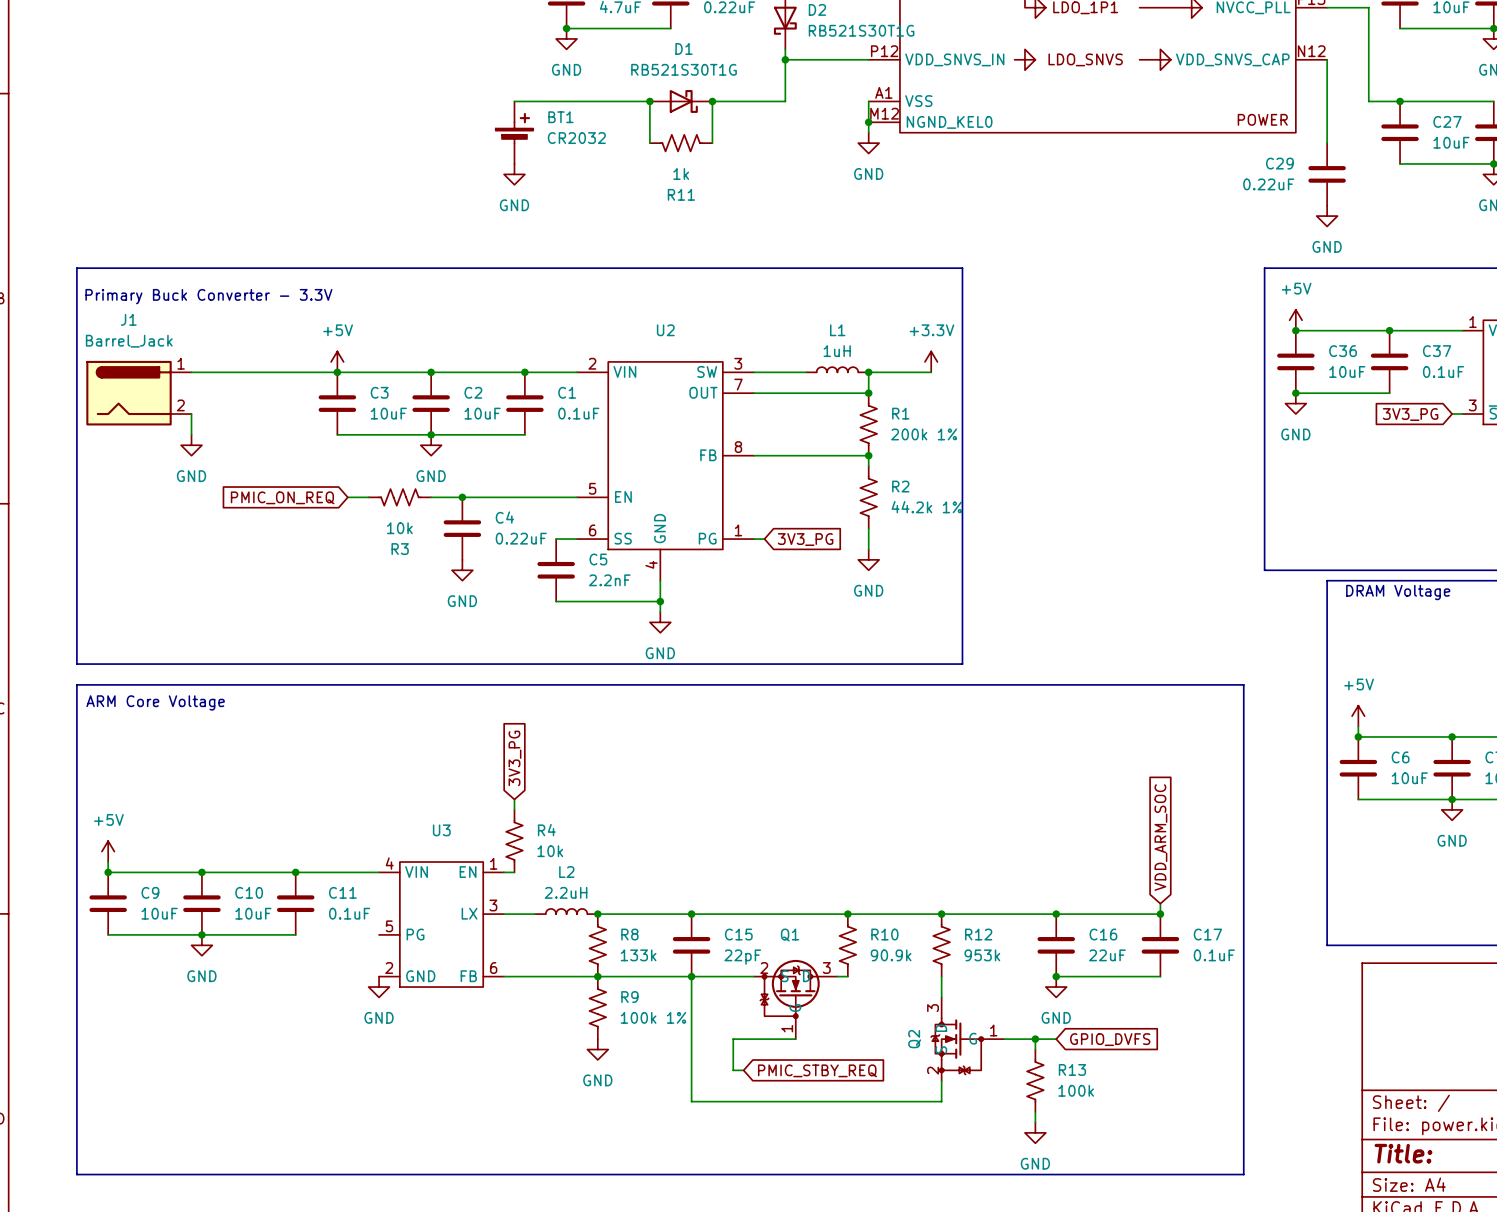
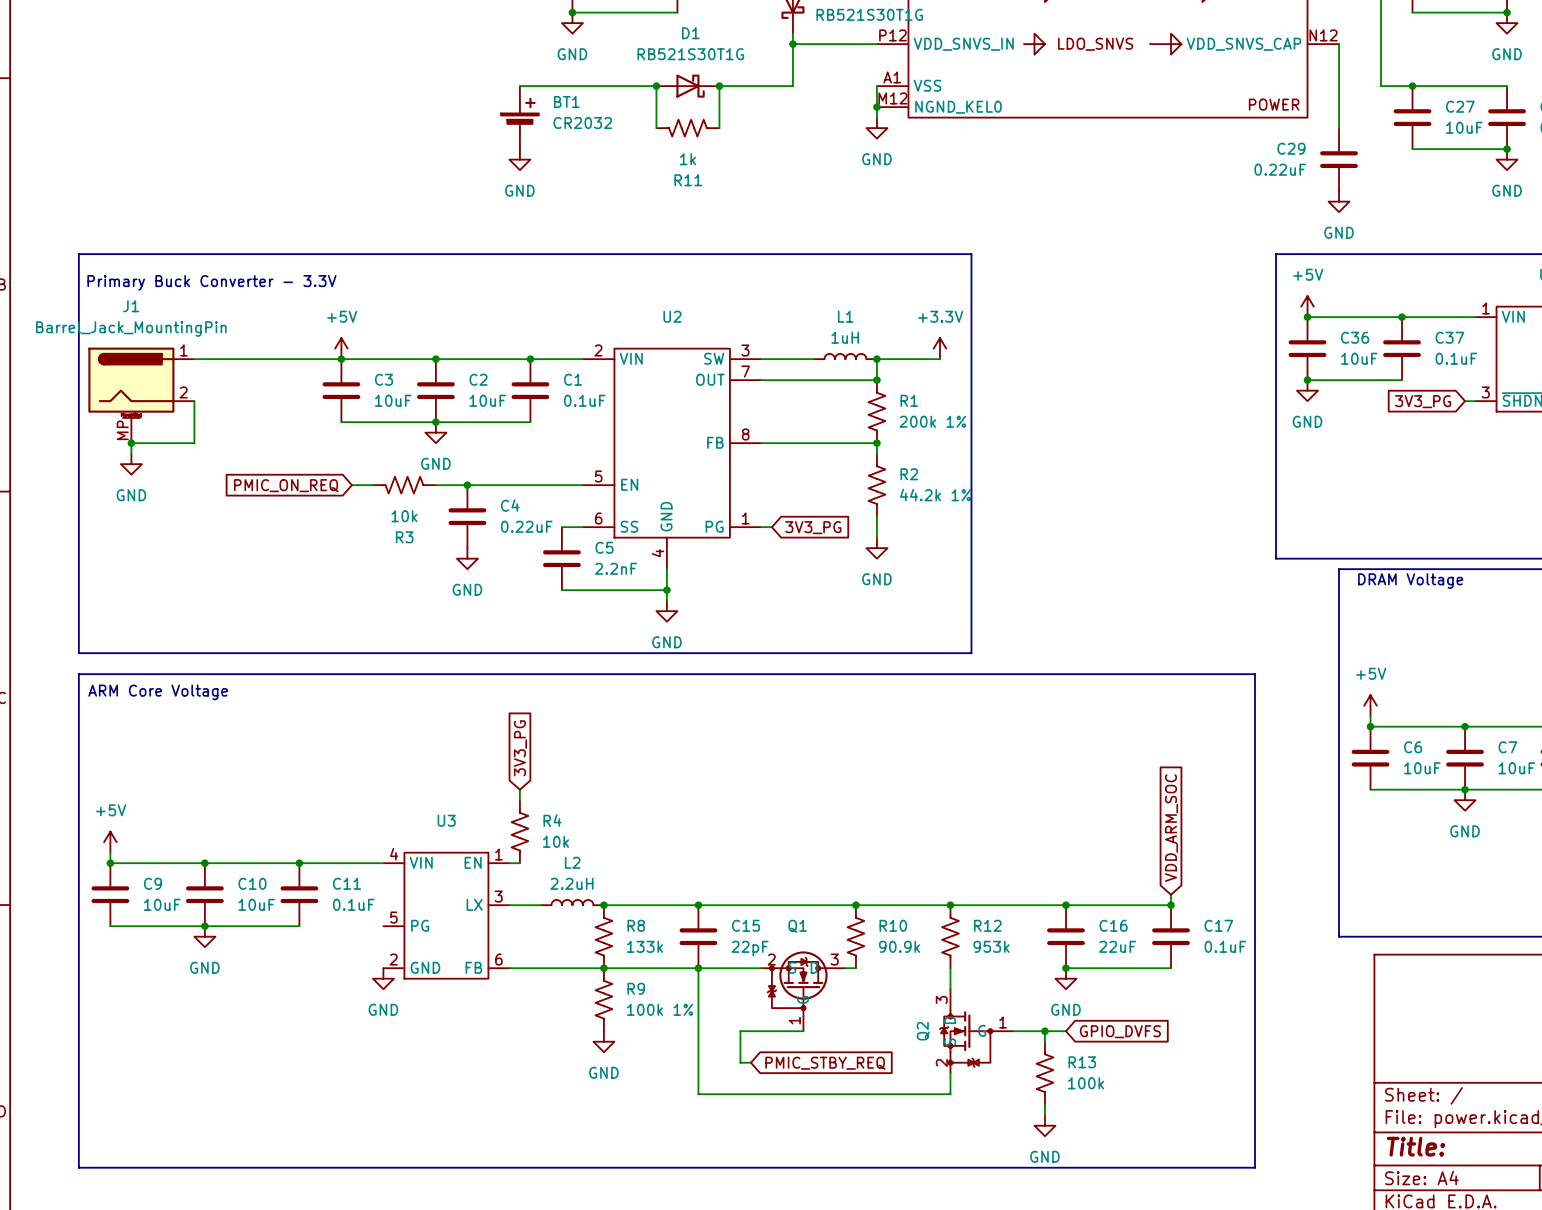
J1 value: Barrel_Jack (129, 341) -> Barrel_Jack_MountingPin (131, 329)
J1 symbol: [86, 360, 192, 426] -> [88, 347, 195, 444]
wire: none -> (194, 422) (194, 443) (131, 443) (131, 453)
power symbol position: GND (191, 445) -> GND (131, 464)
junction: none -> (131, 443)

